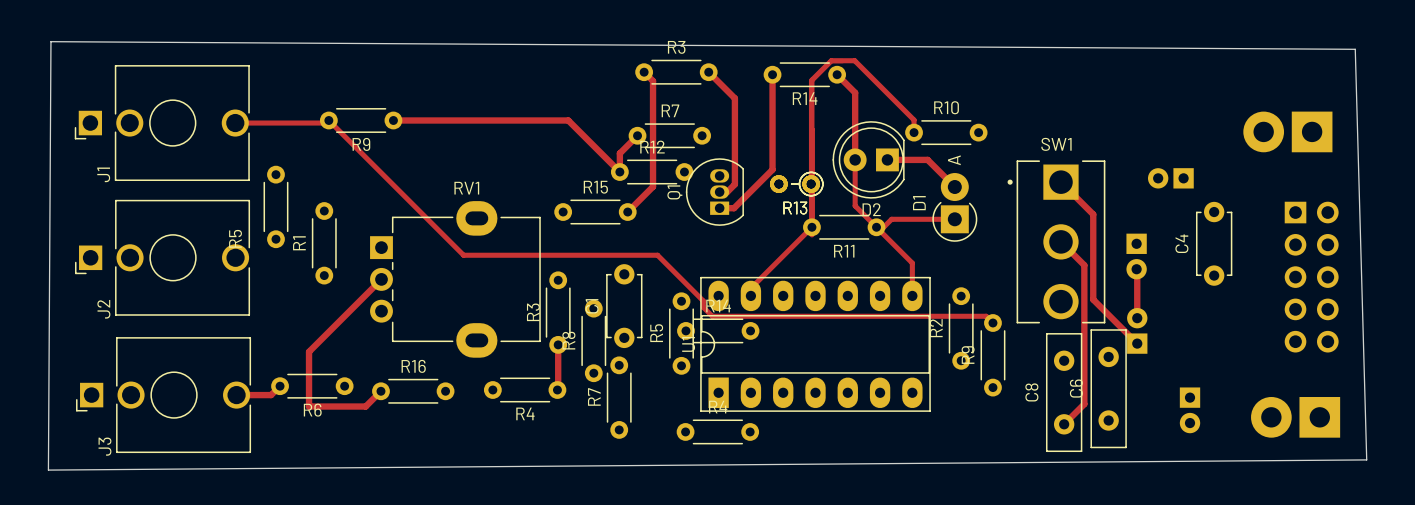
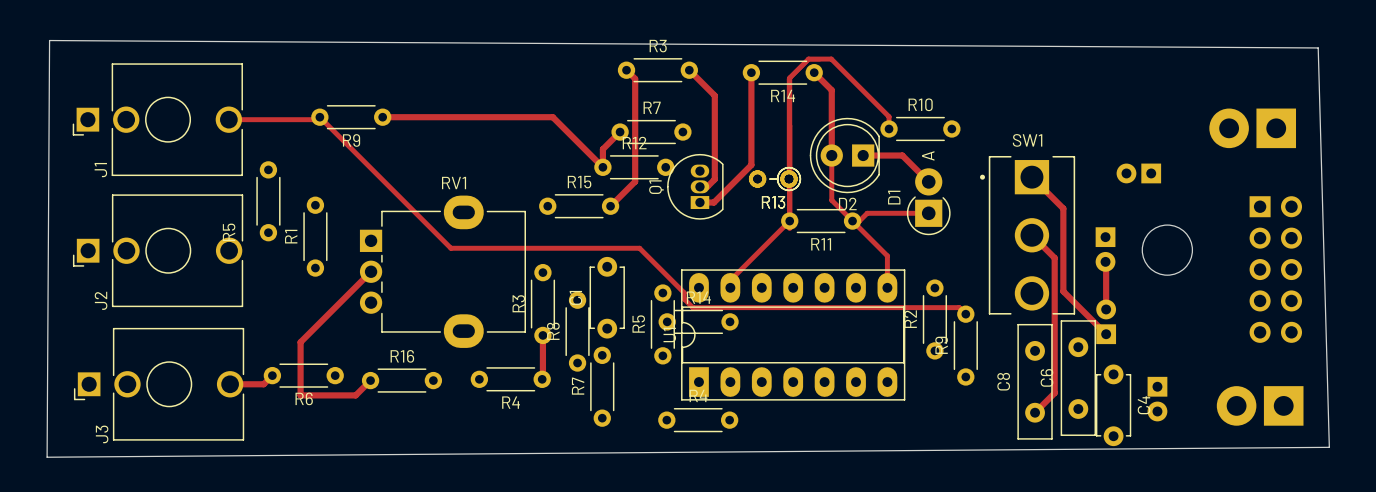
round board edge: none -> [1141, 224, 1194, 276]
C4 name position: C4 (1181, 243) -> C4 (1144, 405)
C4 position: (1214, 243) -> (1113, 405)

